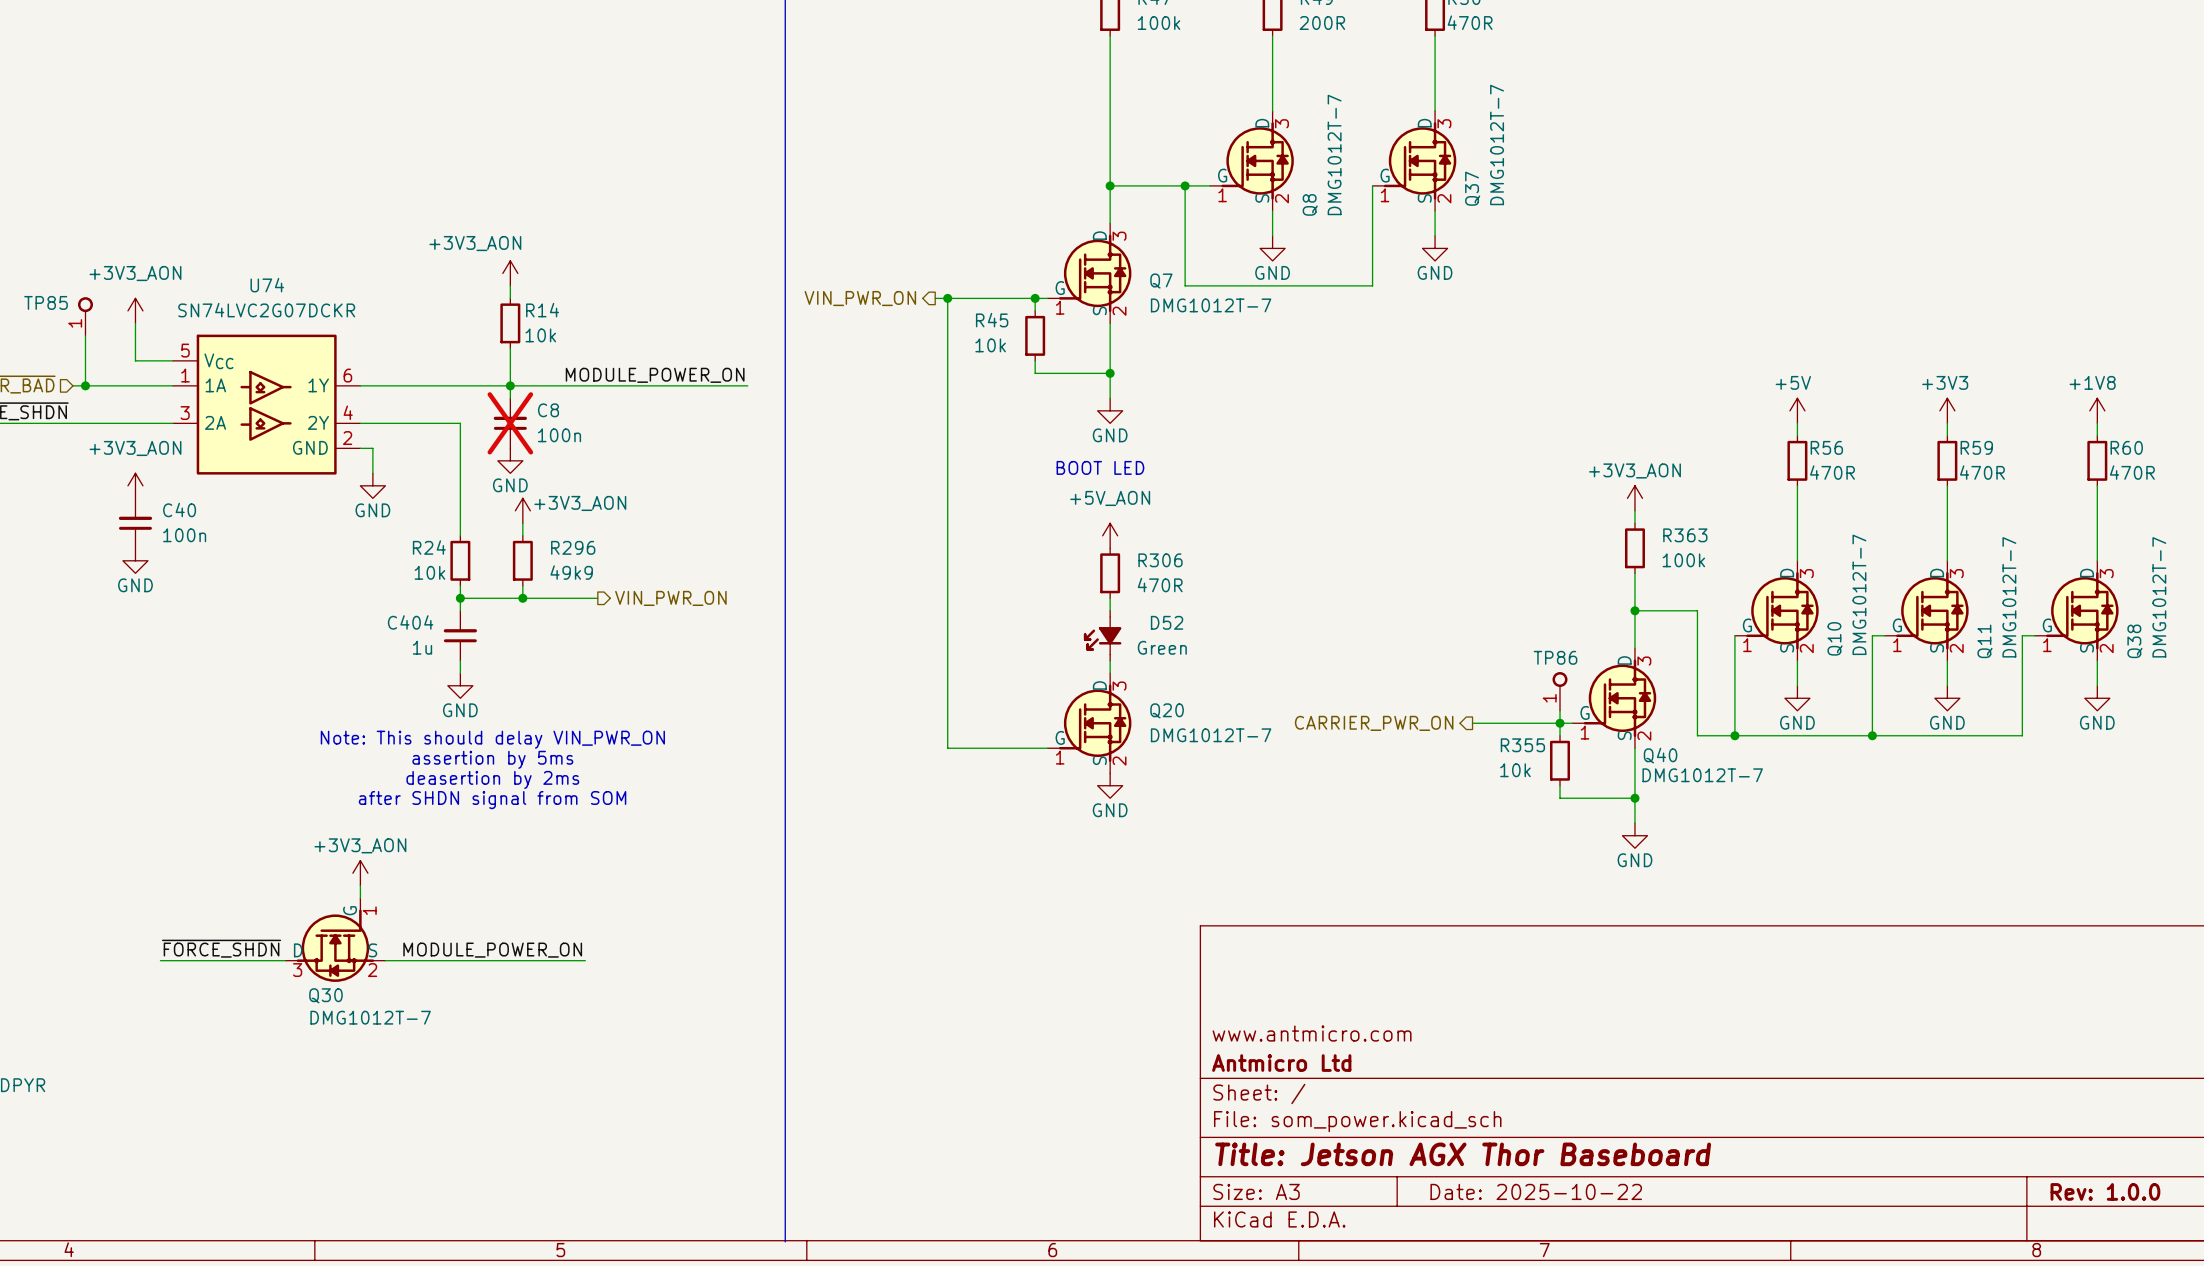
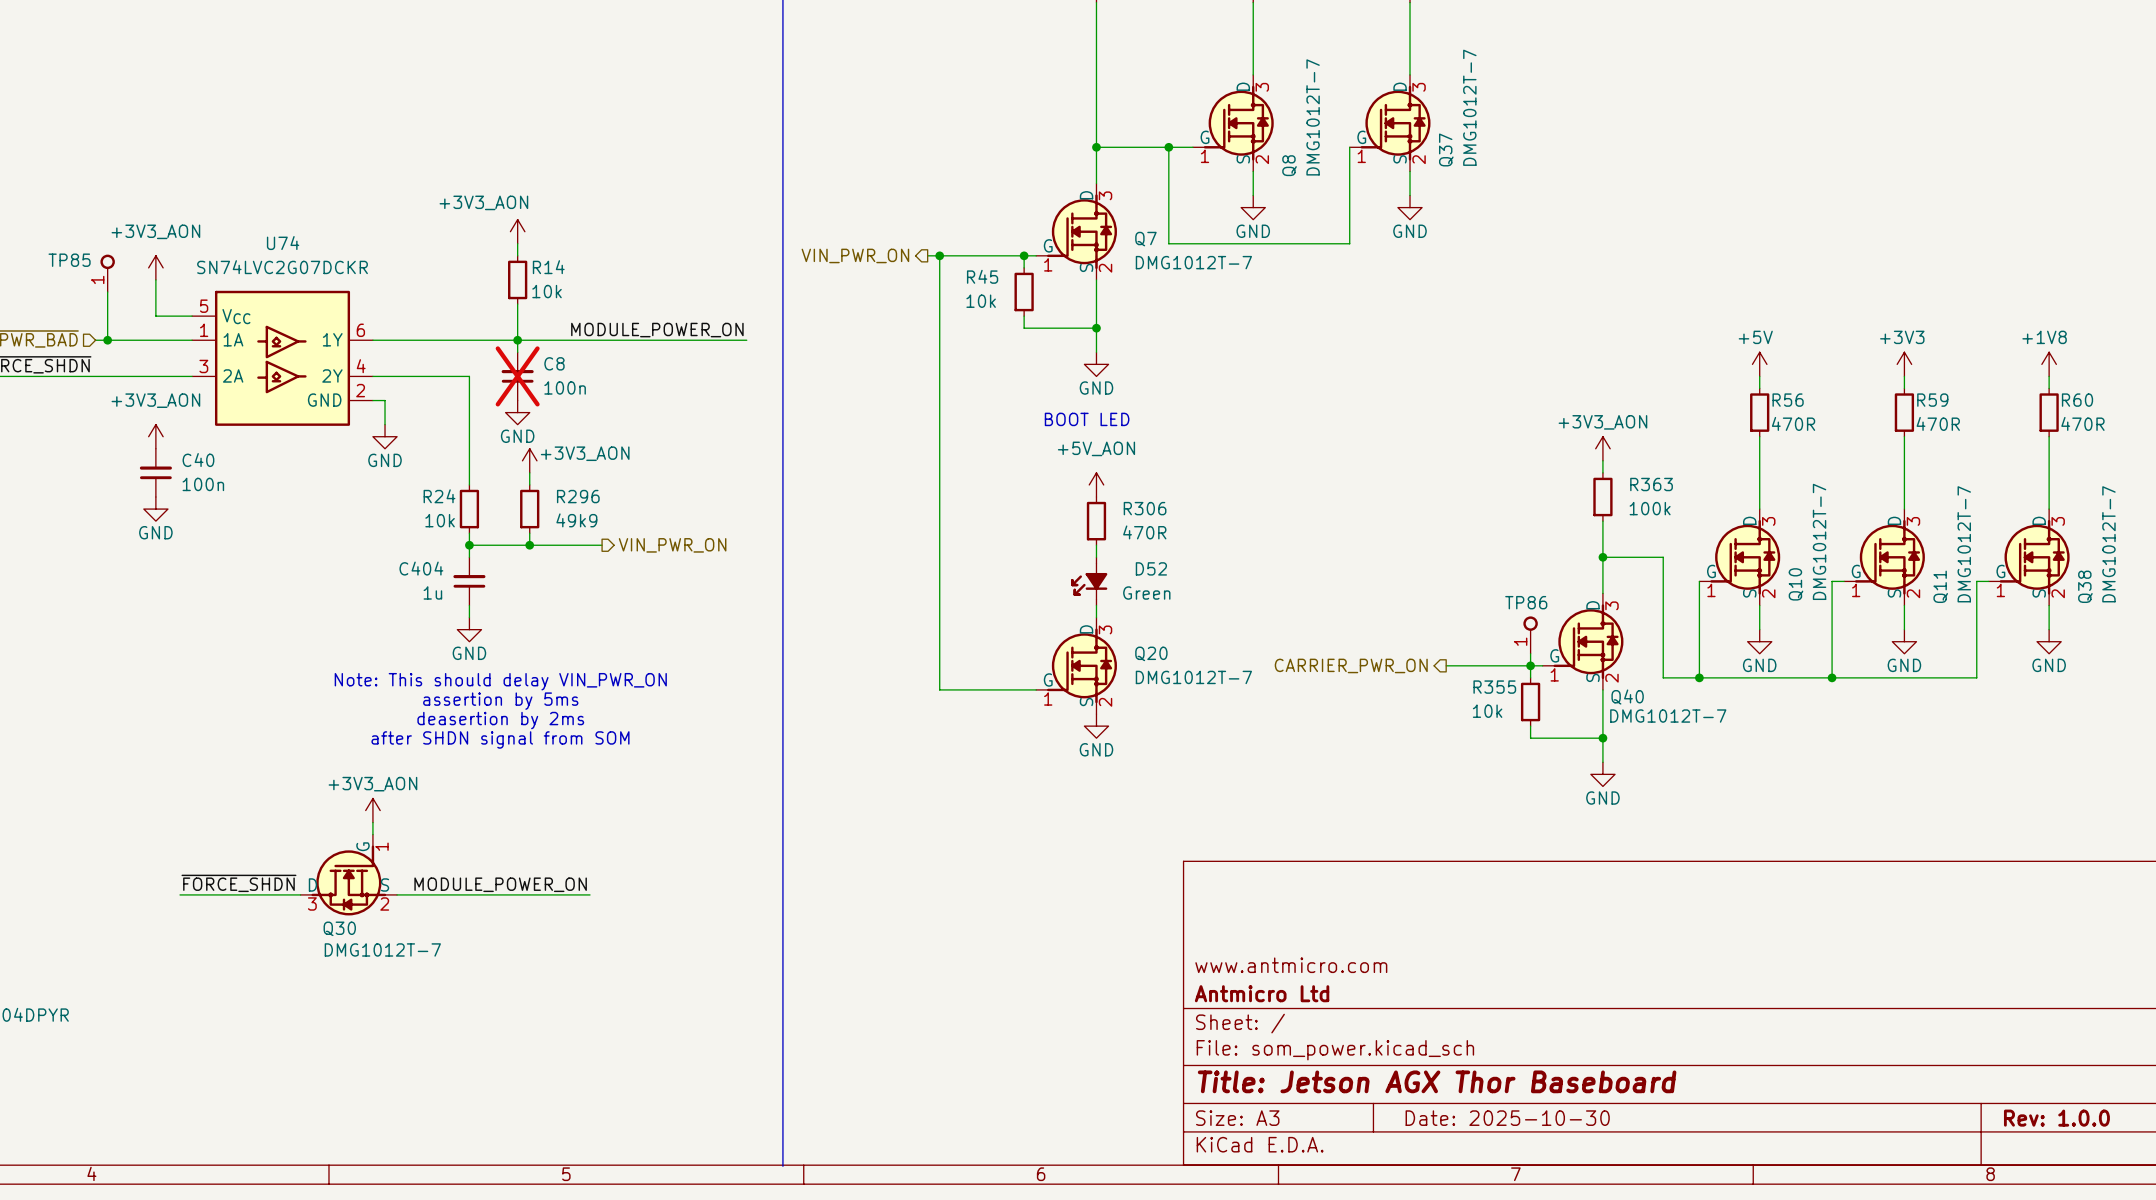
title block: Date: 2025-10-22 (1536, 1191) -> Date: 2025-10-30 (1507, 1118)

